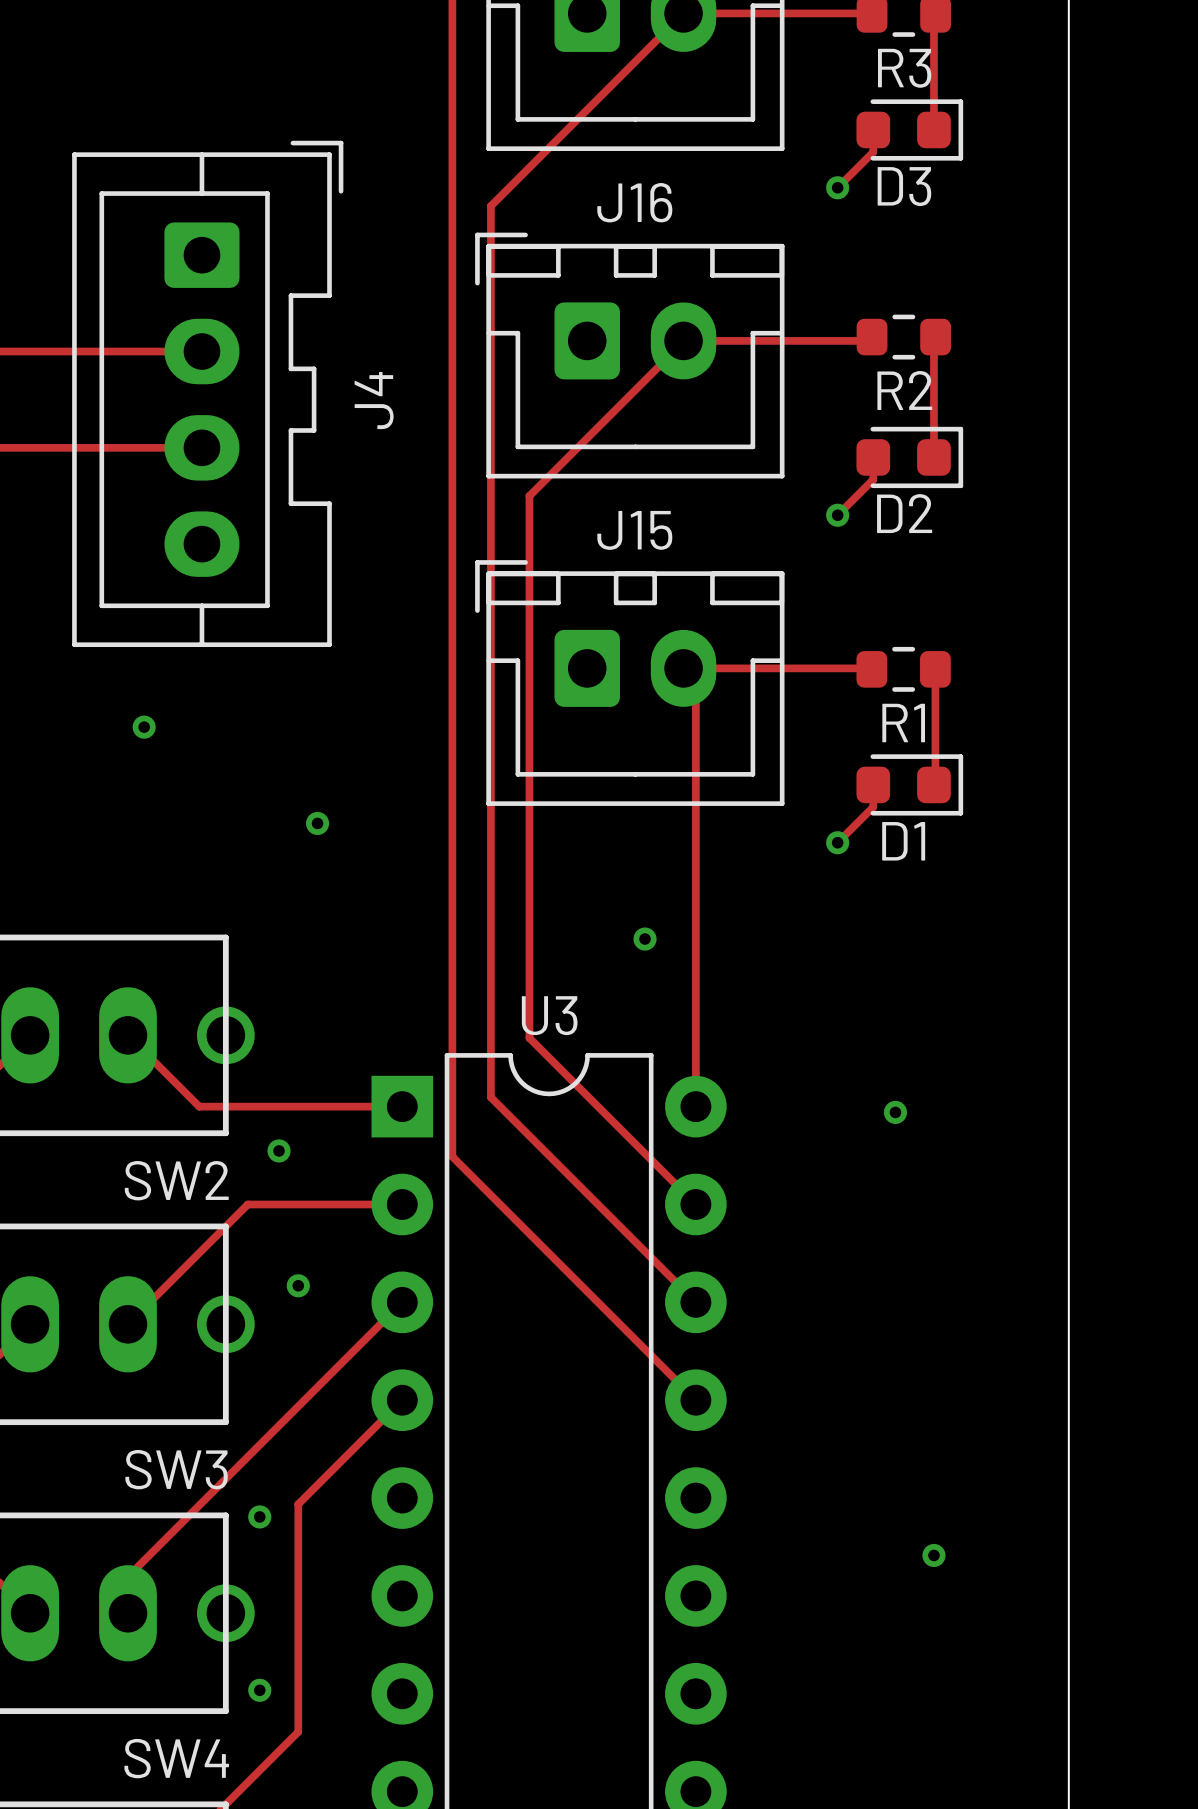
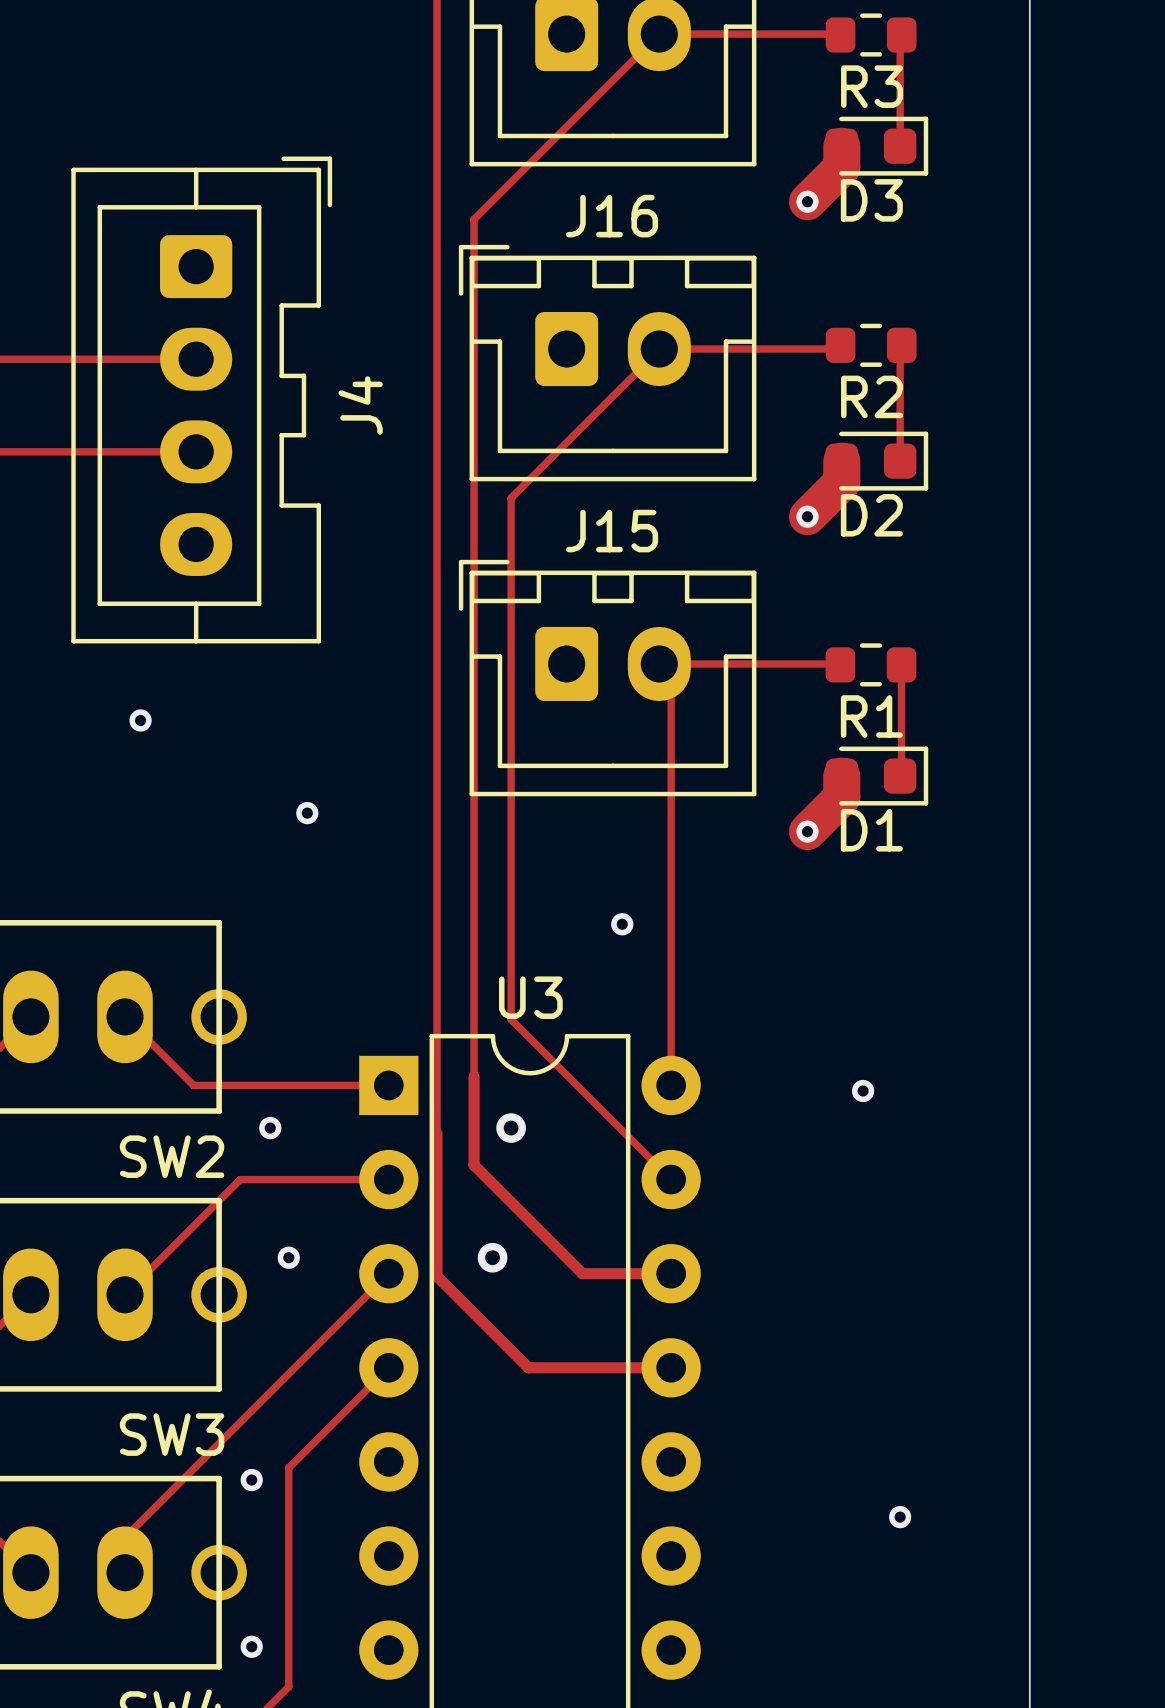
track width: thin (873, 129) (873, 152) (837, 187) -> thick (841, 146) (841, 167) (807, 201)
track width: thin (873, 457) (873, 479) (837, 515) -> thick (841, 461) (841, 482) (807, 516)
track width: thin (873, 784) (873, 807) (837, 842) -> thick (841, 776) (841, 797) (807, 831)
track: (490, 1097) (695, 1302) -> (474, 1076) (474, 1165) (582, 1273) (671, 1273)
via: none -> (511, 1128)
track: (452, 1156) (695, 1400) -> (436, 1133) (436, 1276) (528, 1367) (671, 1367)
via: none -> (492, 1257)

